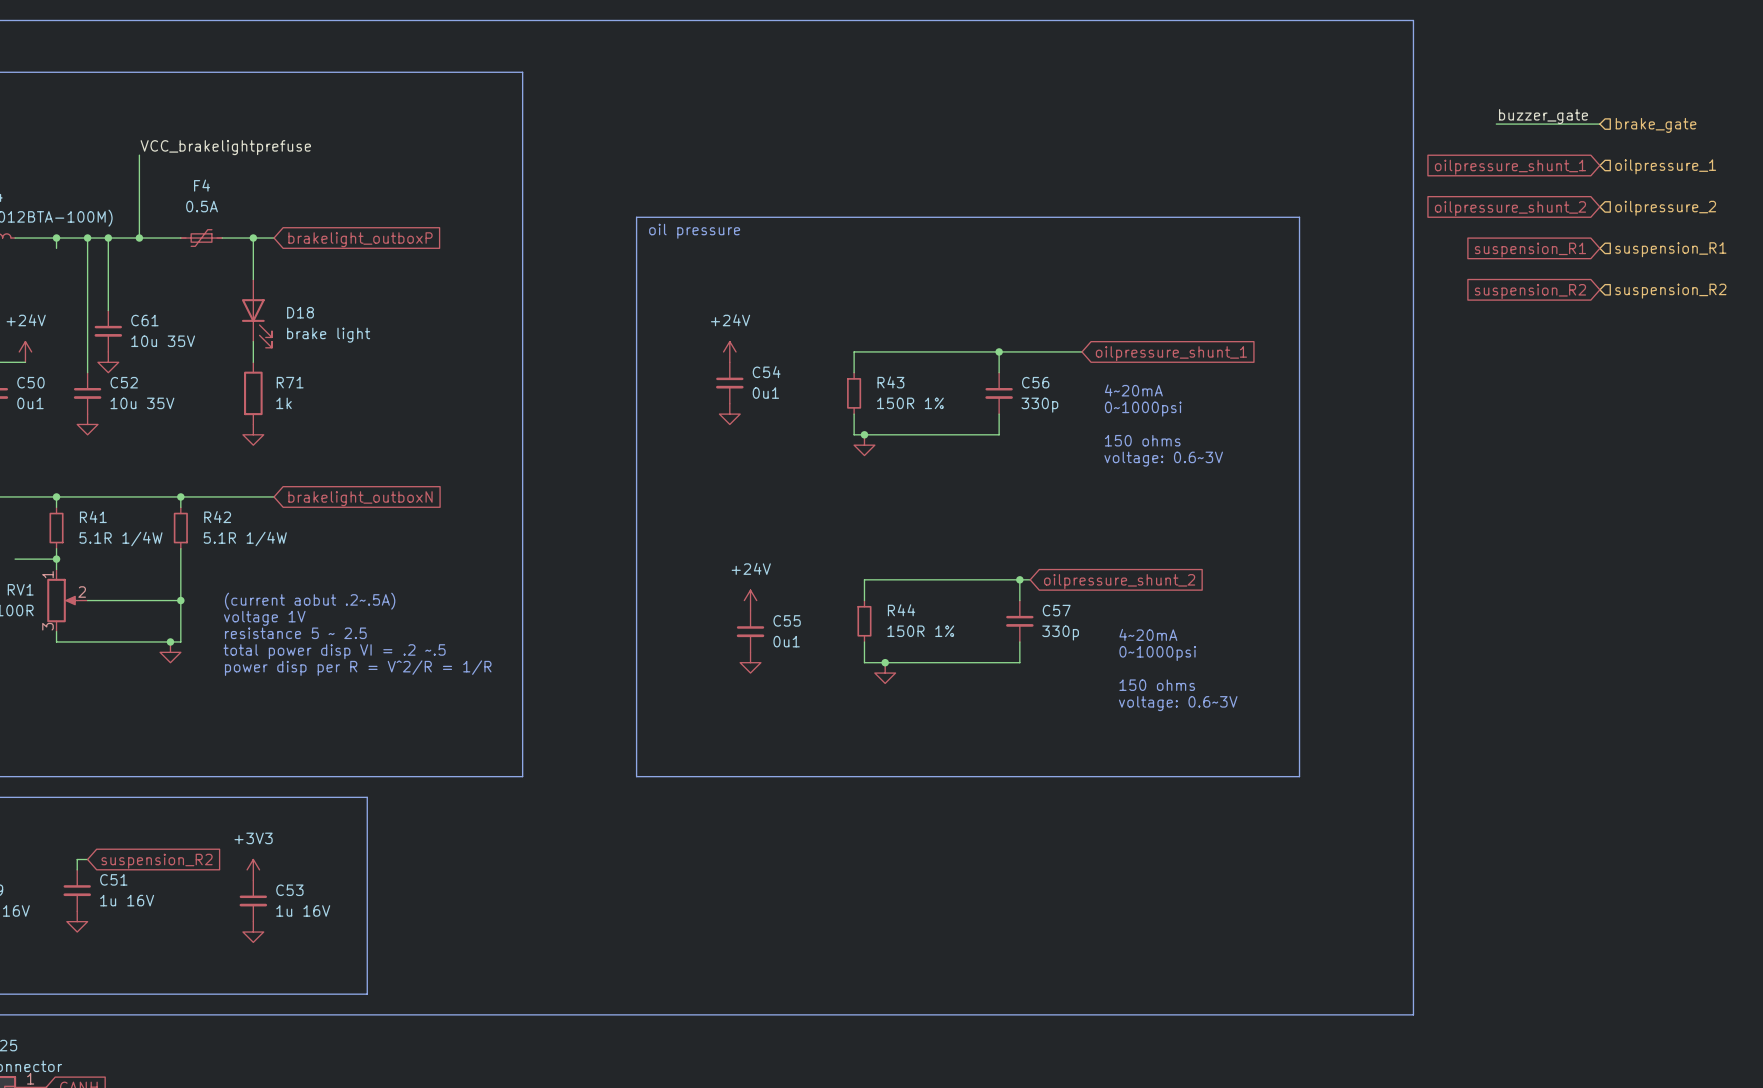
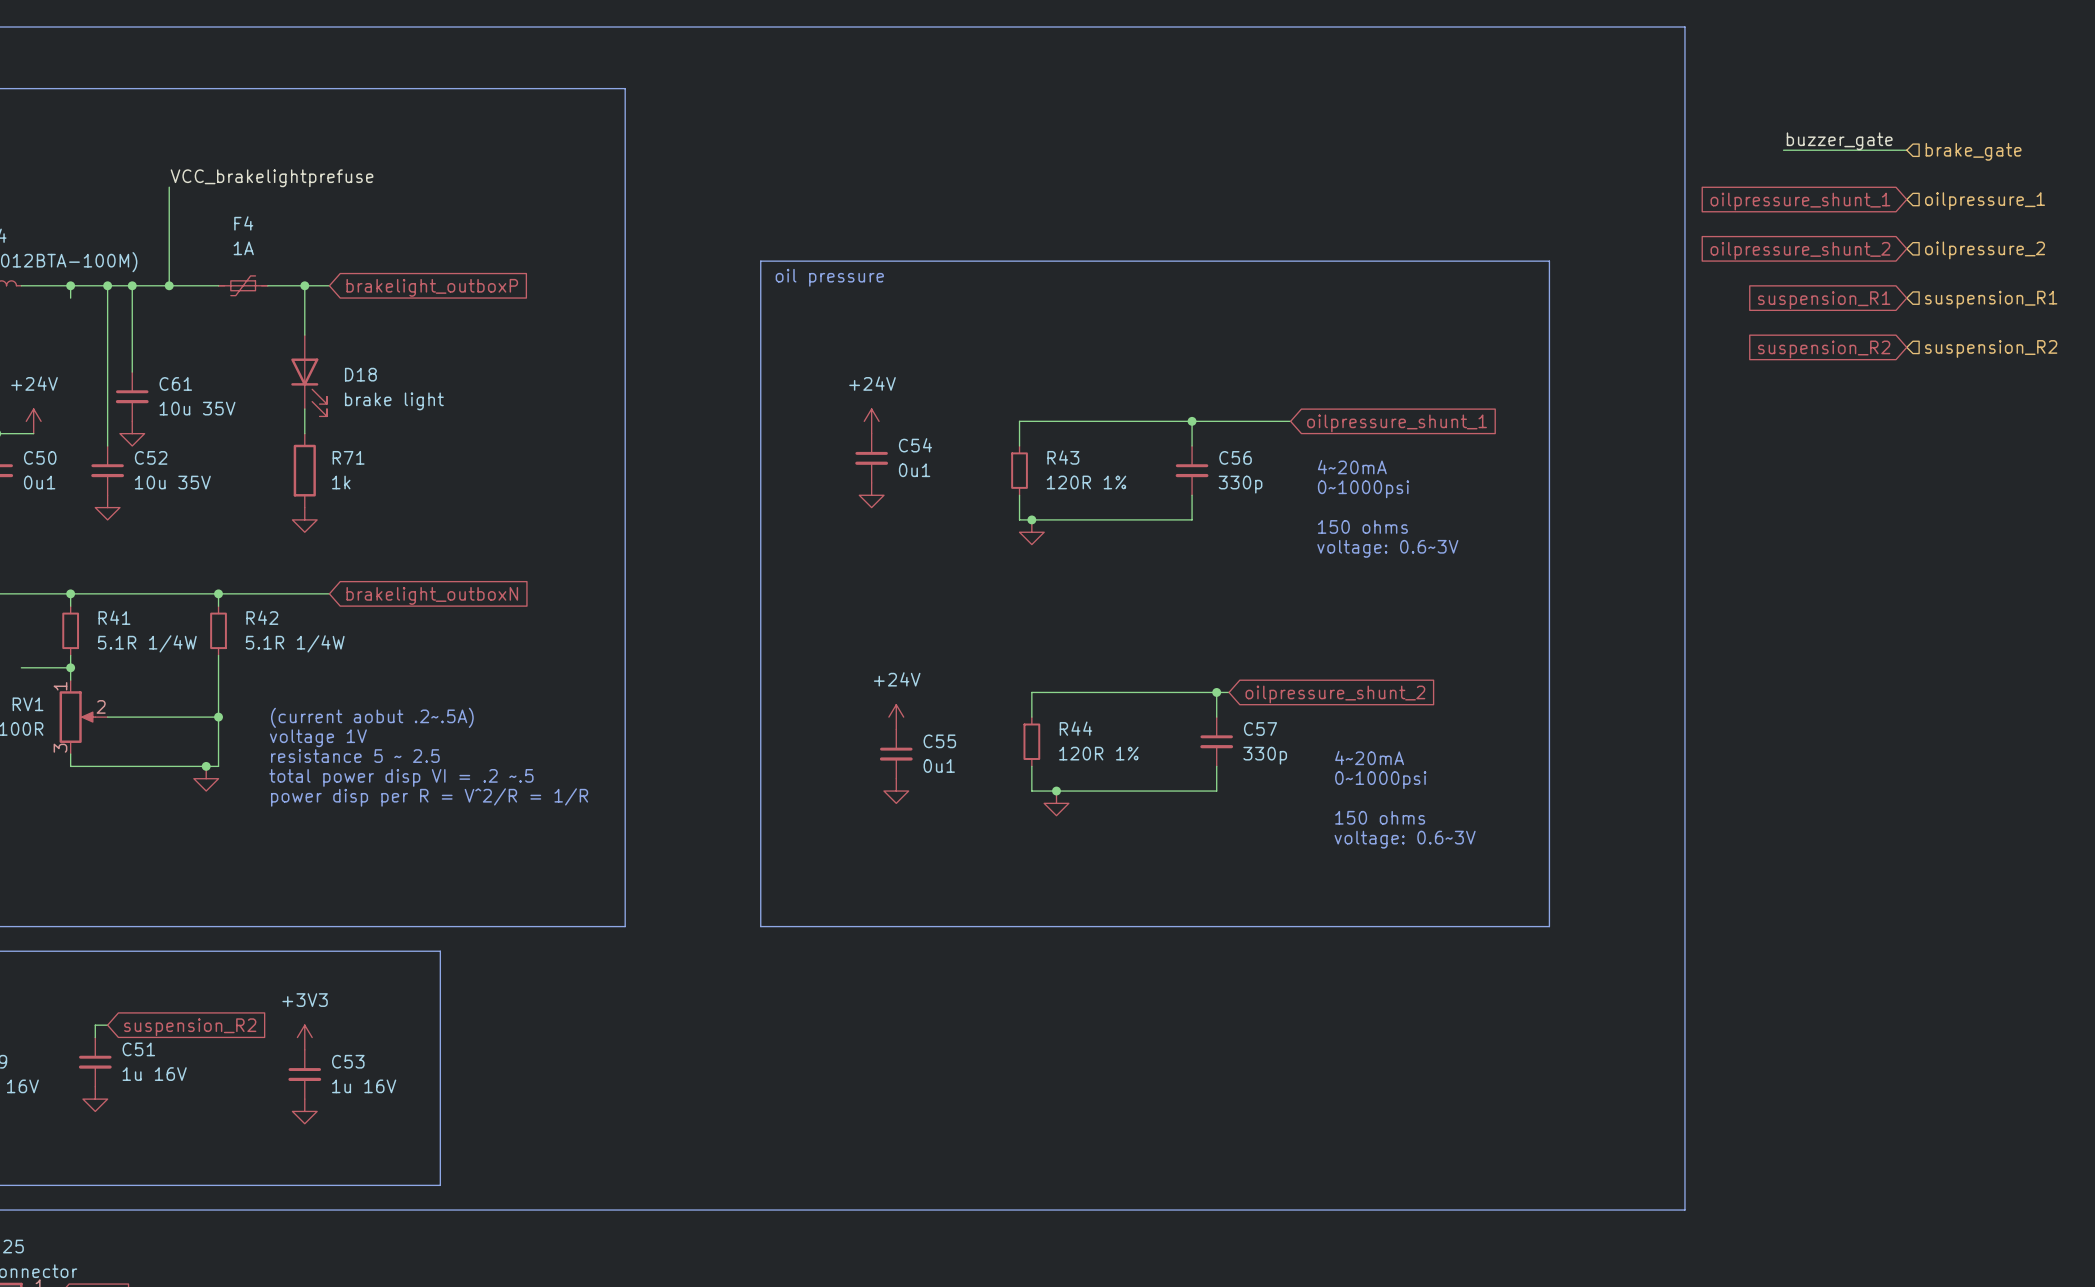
F4 value: 0.5A (202, 206) -> 1A (243, 248)
R43 value: 150R 1% (910, 403) -> 120R 1% (1086, 482)
R44 value: 150R 1% (920, 631) -> 120R 1% (1098, 753)

